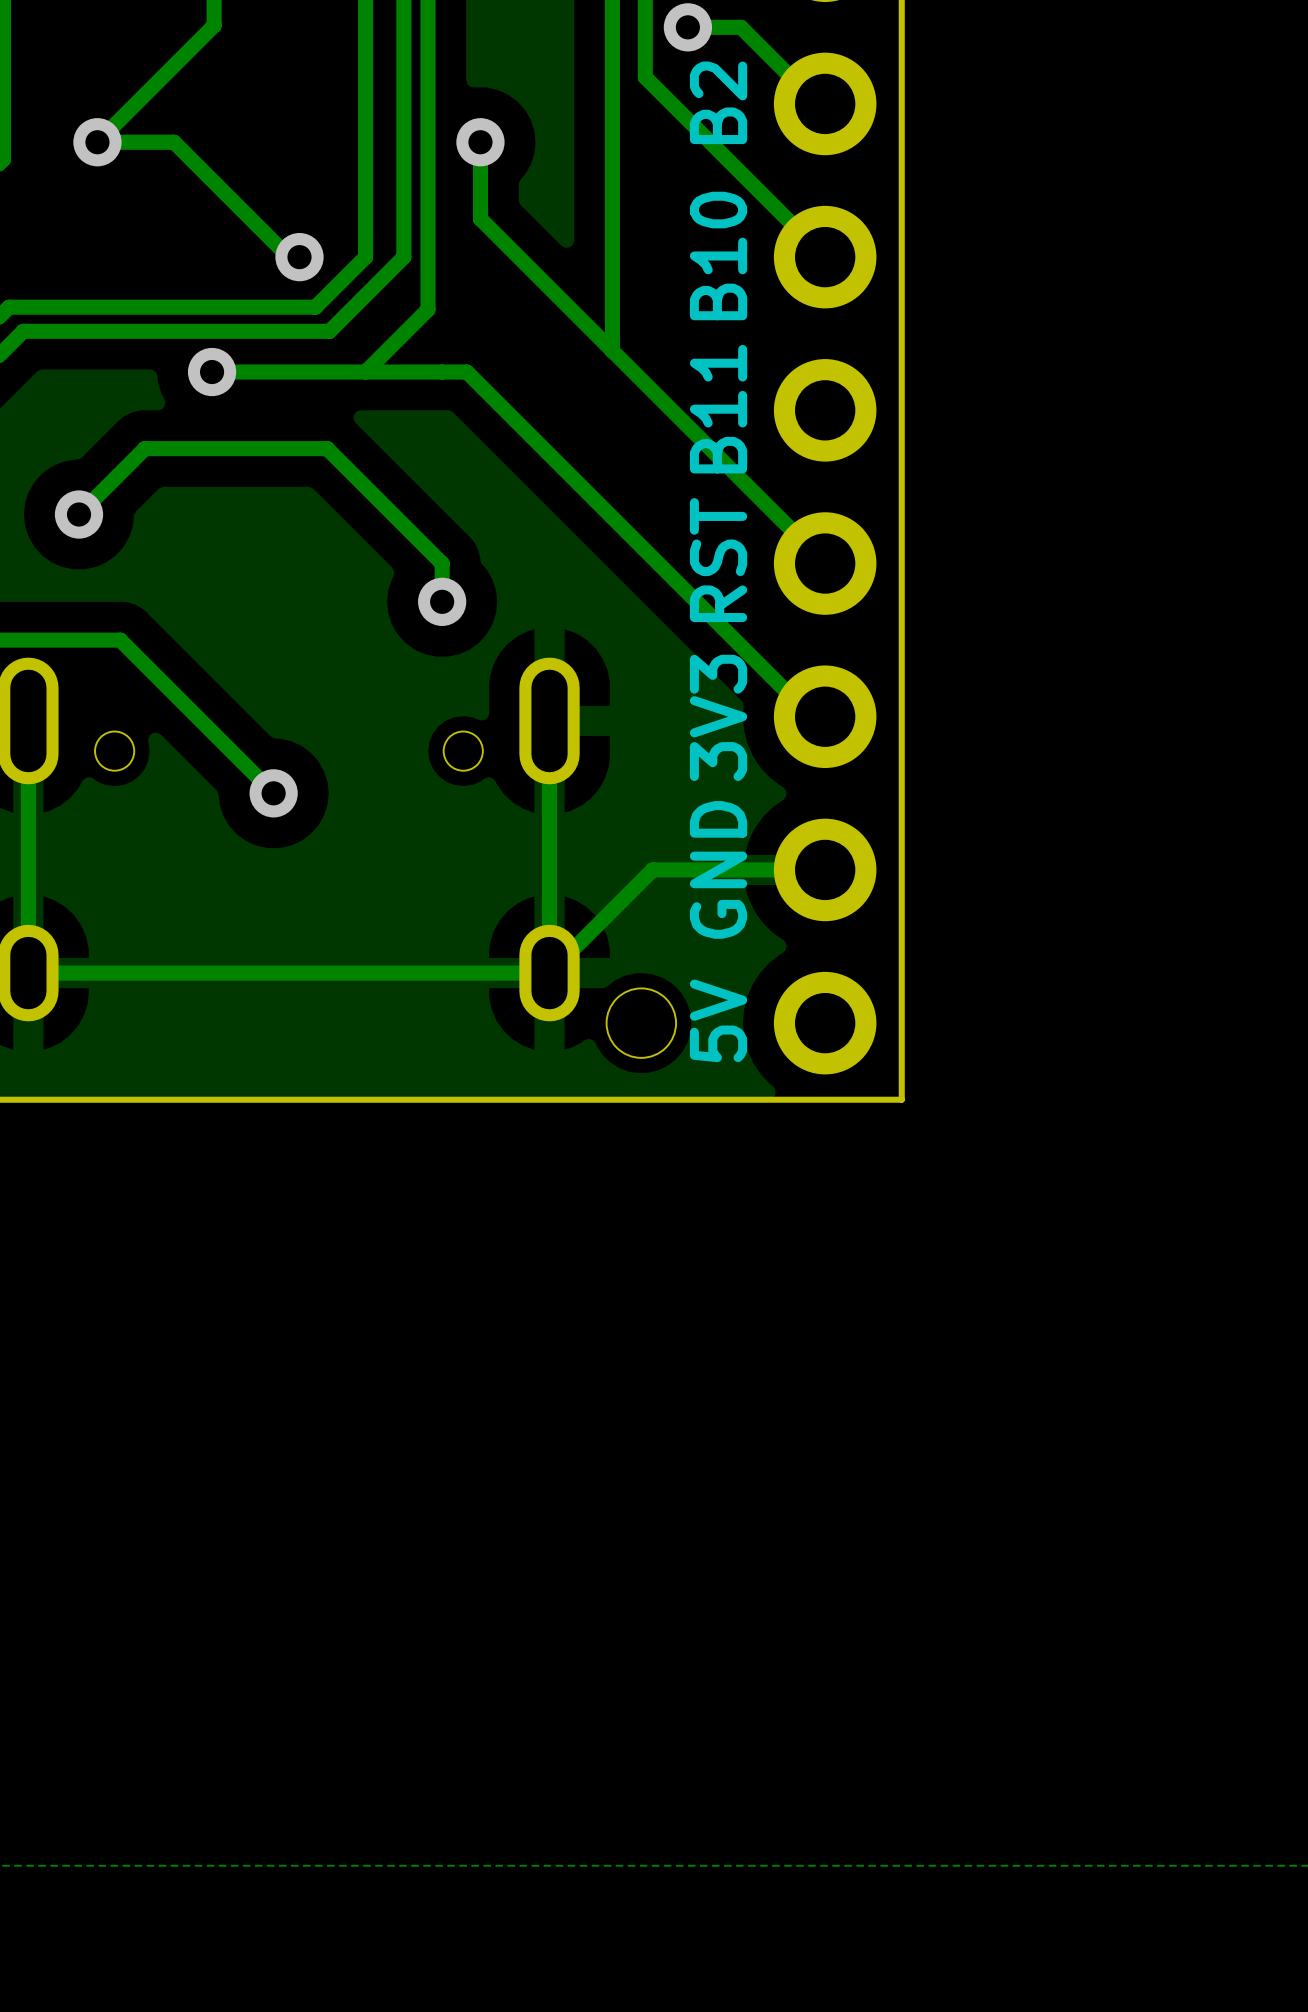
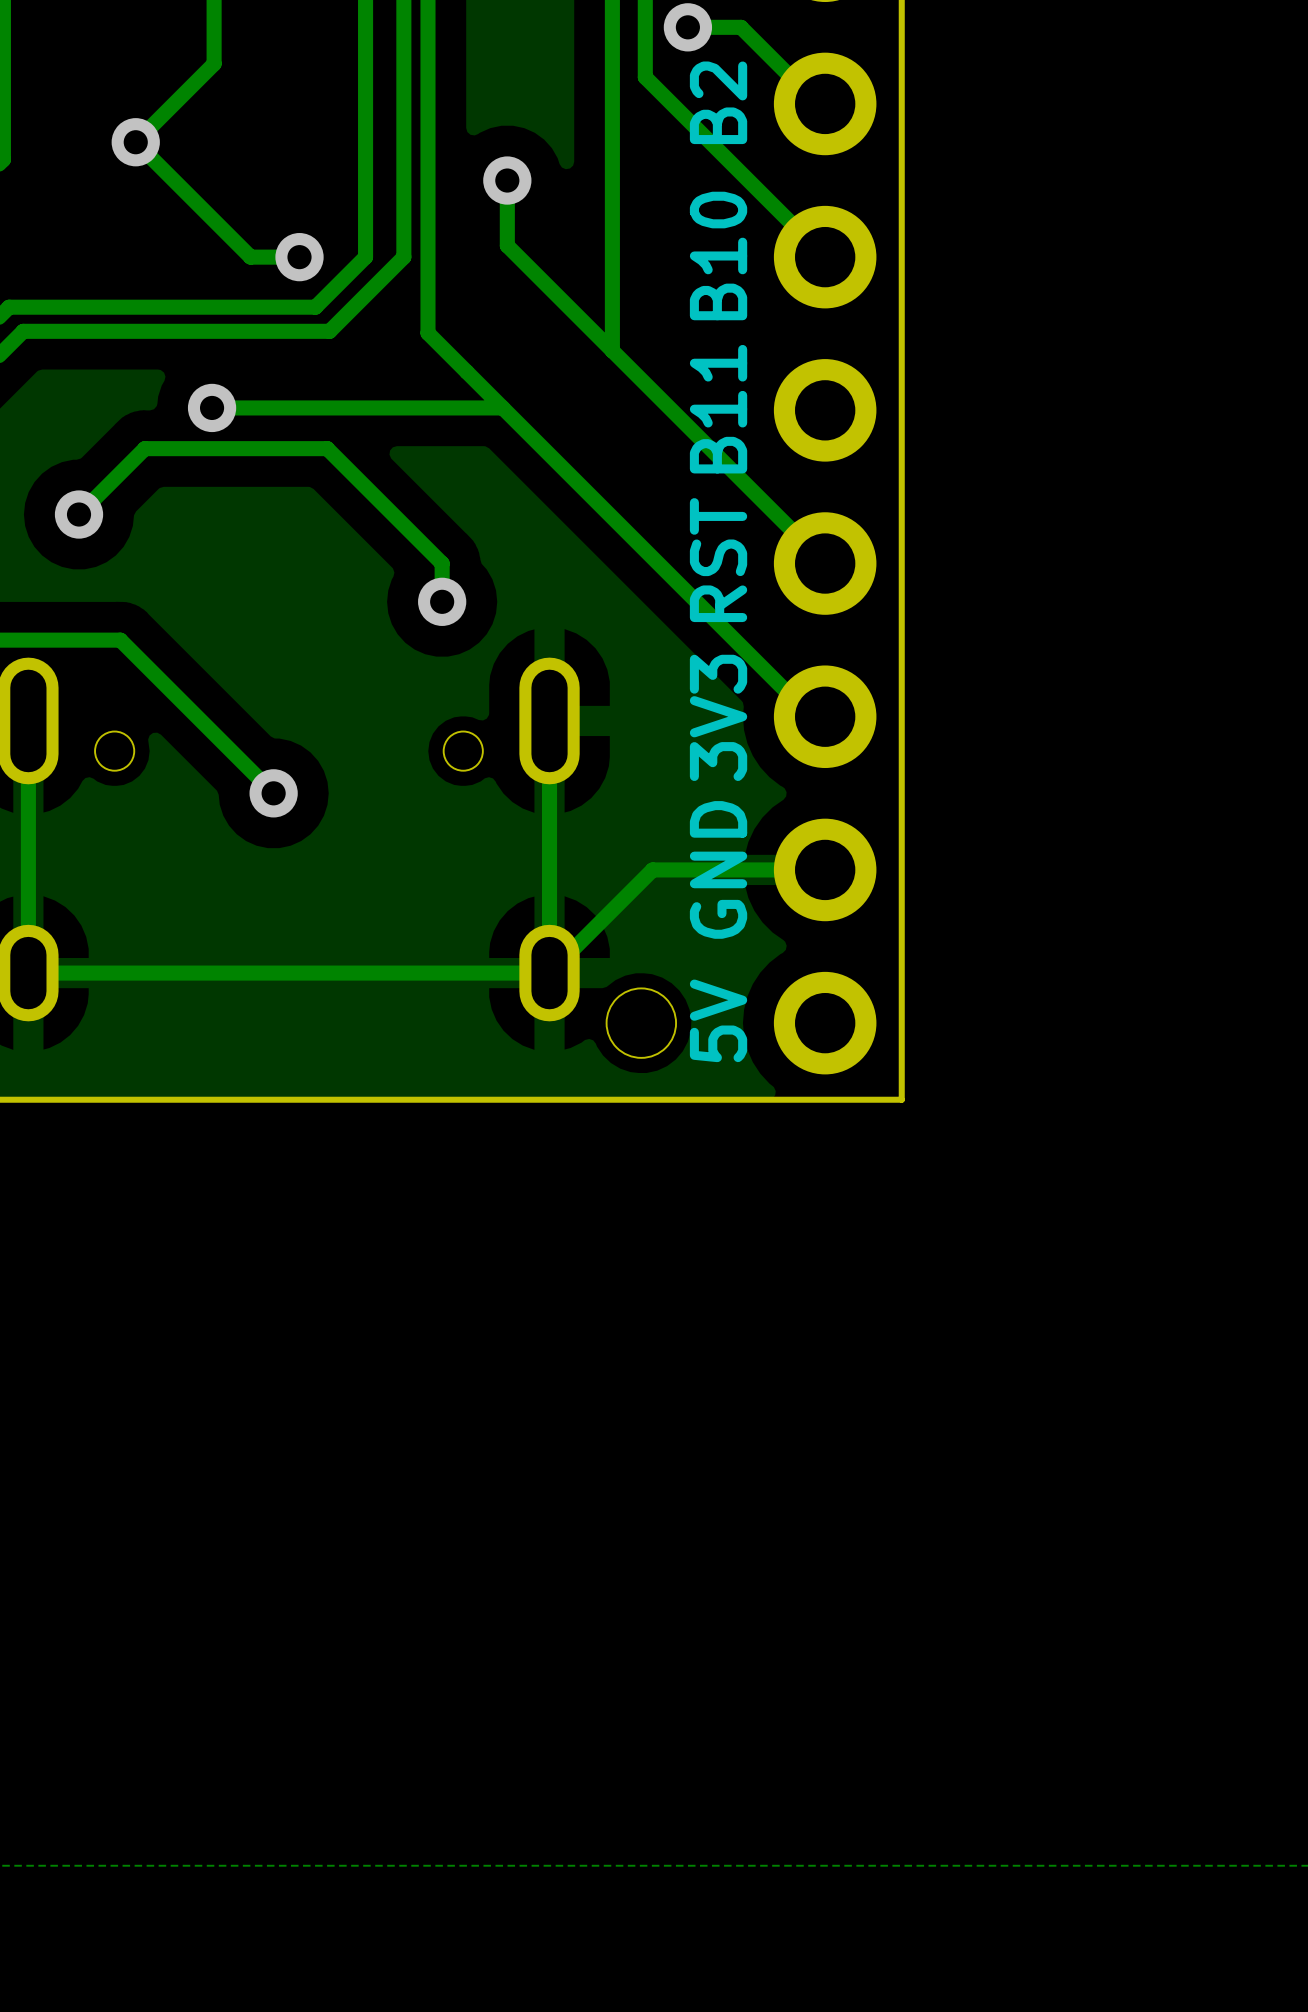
track: (214, 25) (97, 142) (174, 142) (288, 257) -> (214, 25) (214, 63) (135, 142) (250, 257) (288, 257)
via position: (97, 142) -> (135, 142)
track: (480, 142) (480, 218) (507, 245) -> (507, 180) (507, 245)
via position: (480, 142) -> (507, 180)
track: (427, 309) (365, 372) -> (427, 309) (427, 333) (466, 372)
via position: (212, 372) -> (212, 407)
track: (466, 372) (212, 372) -> none
track: none -> (502, 407) (212, 407)

